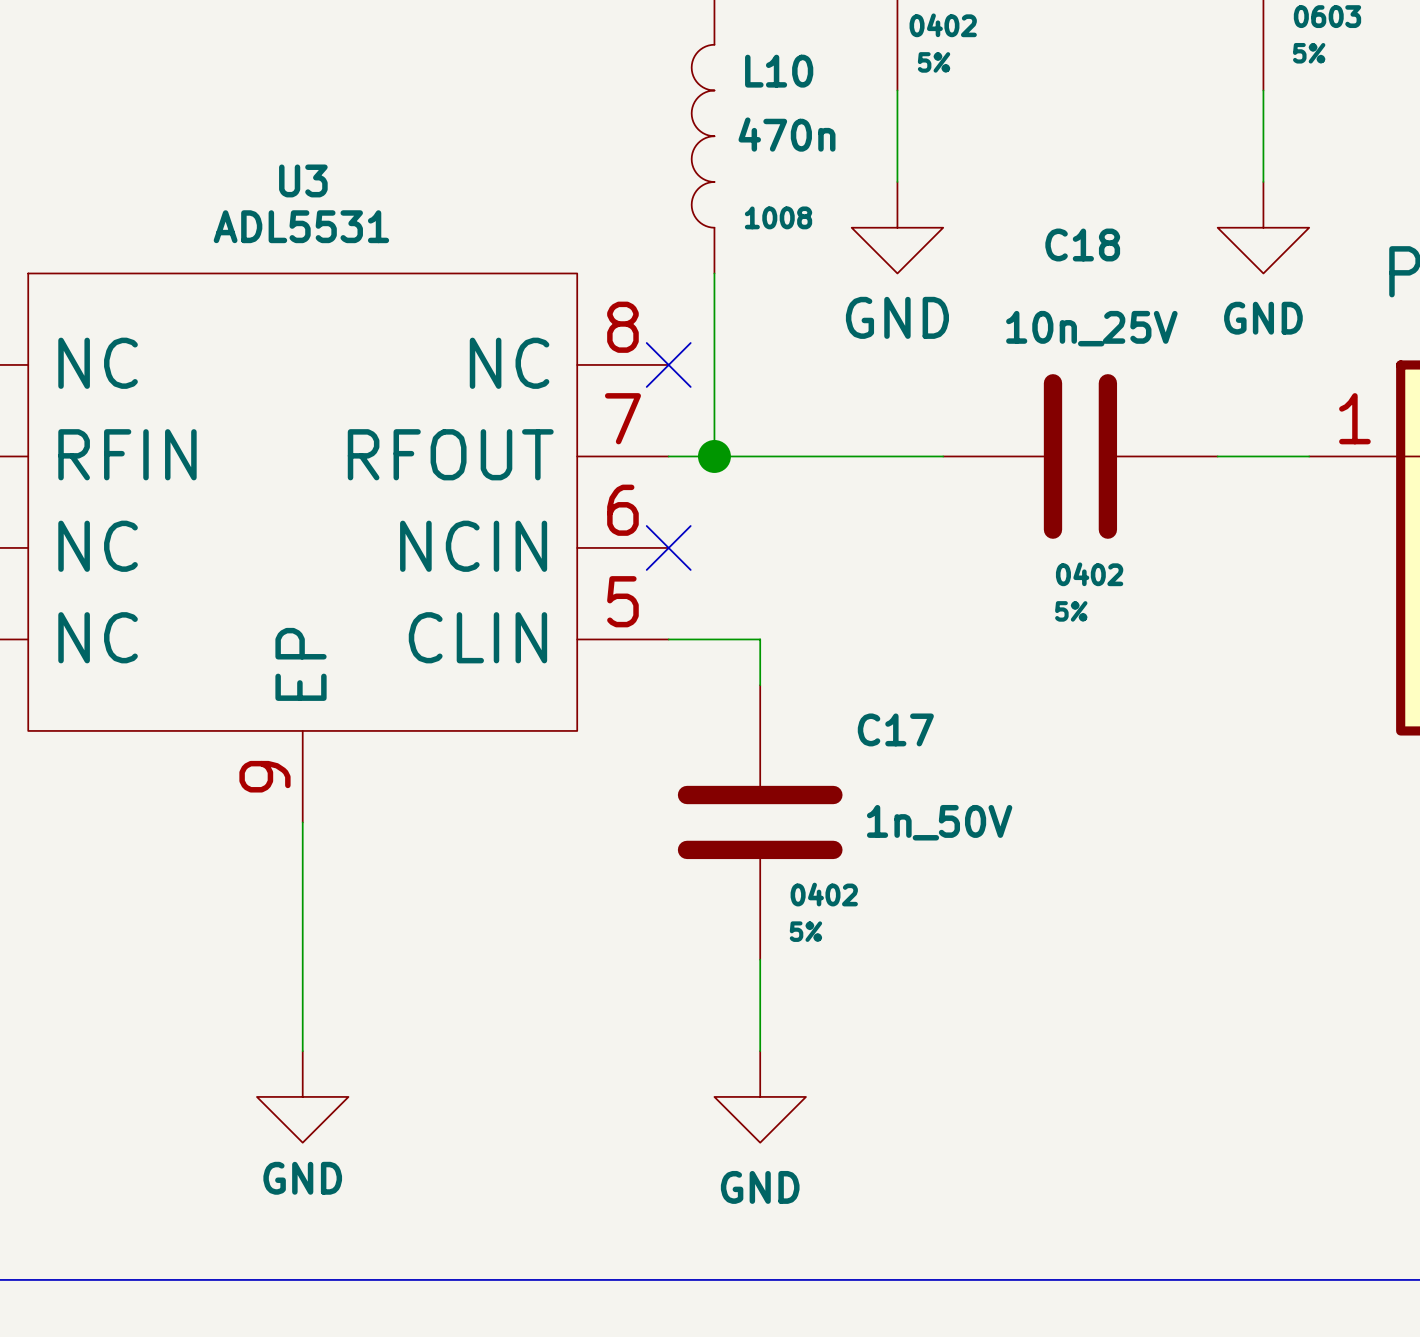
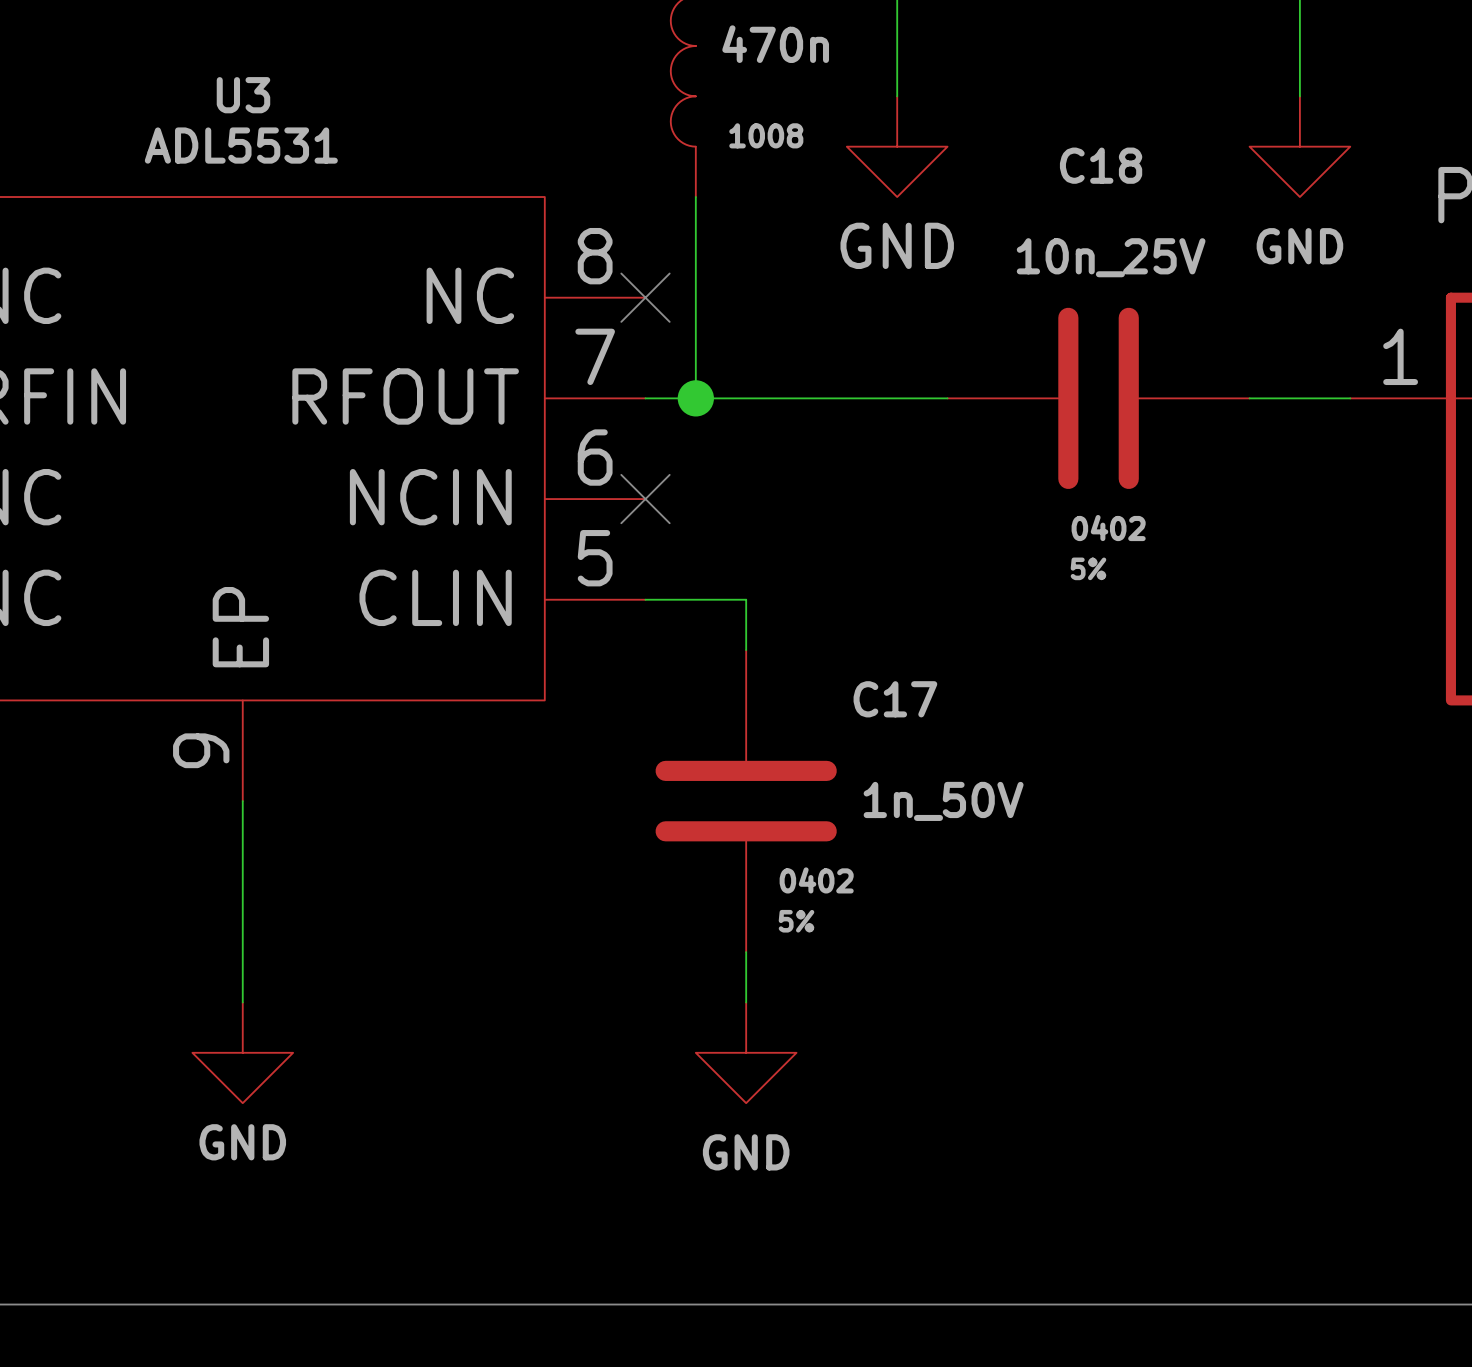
power symbol position: GND (302, 1096) -> GND (242, 1052)
power symbol position: GND (760, 1096) -> GND (746, 1052)

